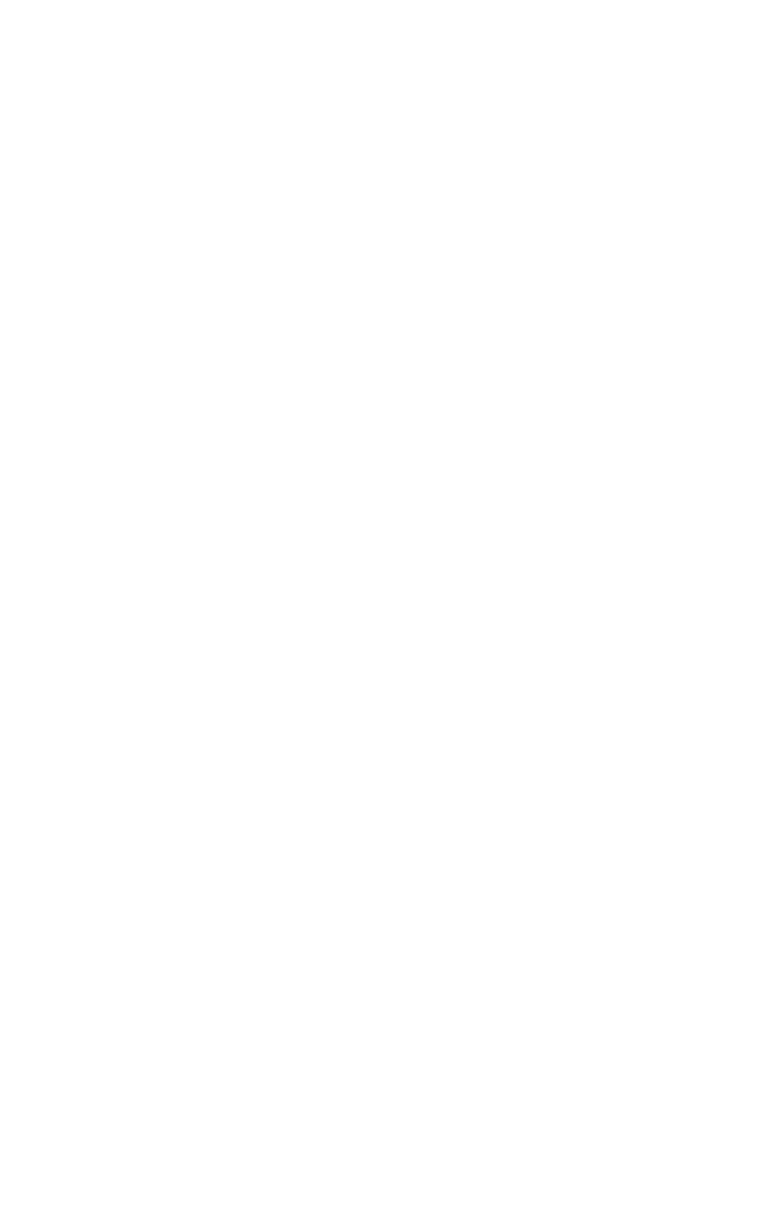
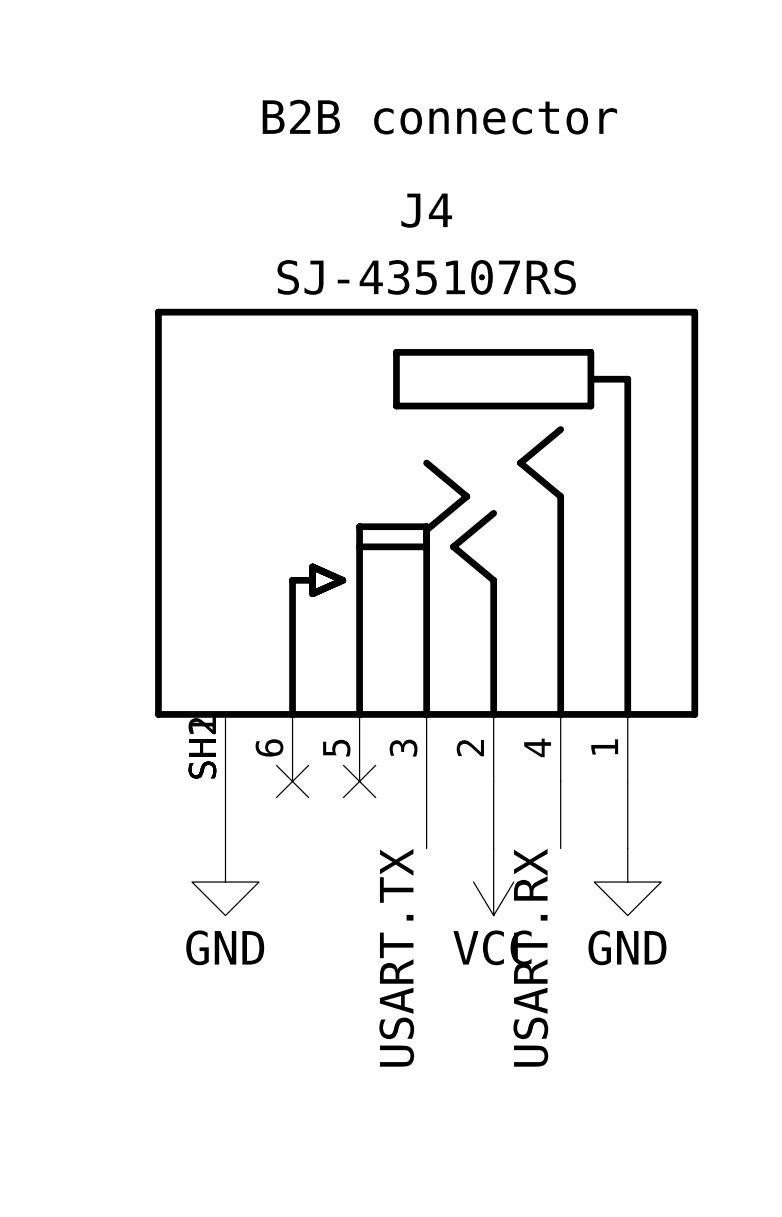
text: none -> B2B connector (439, 117)
J4: none -> SJ-435107RS (426, 545)
wire: none -> (225, 781) (225, 848)
no-connect mark: none -> (292, 781)
no-connect mark: none -> (359, 781)
wire: none -> (426, 781) (426, 848)
wire: none -> (493, 781) (493, 848)
wire: none -> (560, 781) (560, 848)
wire: none -> (627, 781) (627, 848)
power symbol: none -> GND (225, 882)
power symbol: none -> VCC (493, 882)
power symbol: none -> GND (627, 882)
label: none -> USART.TX (396, 957)
label: none -> USART.RX (530, 957)

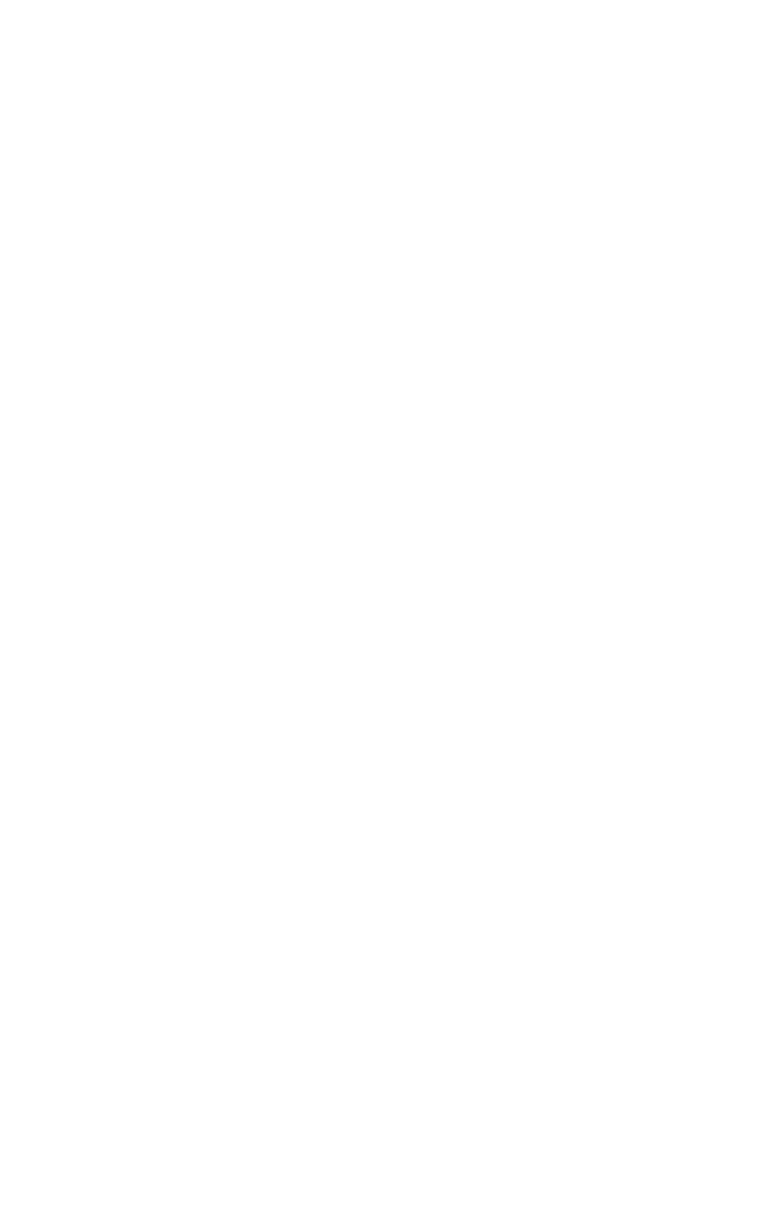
text: B2B connector (439, 117) -> none
J4: SJ-435107RS (426, 545) -> none
wire: (225, 781) (225, 848) -> none
no-connect mark: (292, 781) -> none
no-connect mark: (359, 781) -> none
wire: (426, 781) (426, 848) -> none
wire: (493, 781) (493, 848) -> none
wire: (560, 781) (560, 848) -> none
wire: (627, 781) (627, 848) -> none
power symbol: GND (225, 882) -> none
power symbol: VCC (493, 882) -> none
power symbol: GND (627, 882) -> none
label: USART.TX (396, 957) -> none
label: USART.RX (530, 957) -> none

